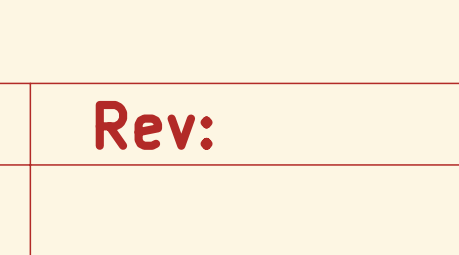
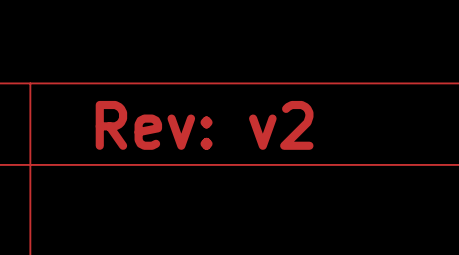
title block: Rev: (154, 125) -> Rev: v2 (204, 125)

